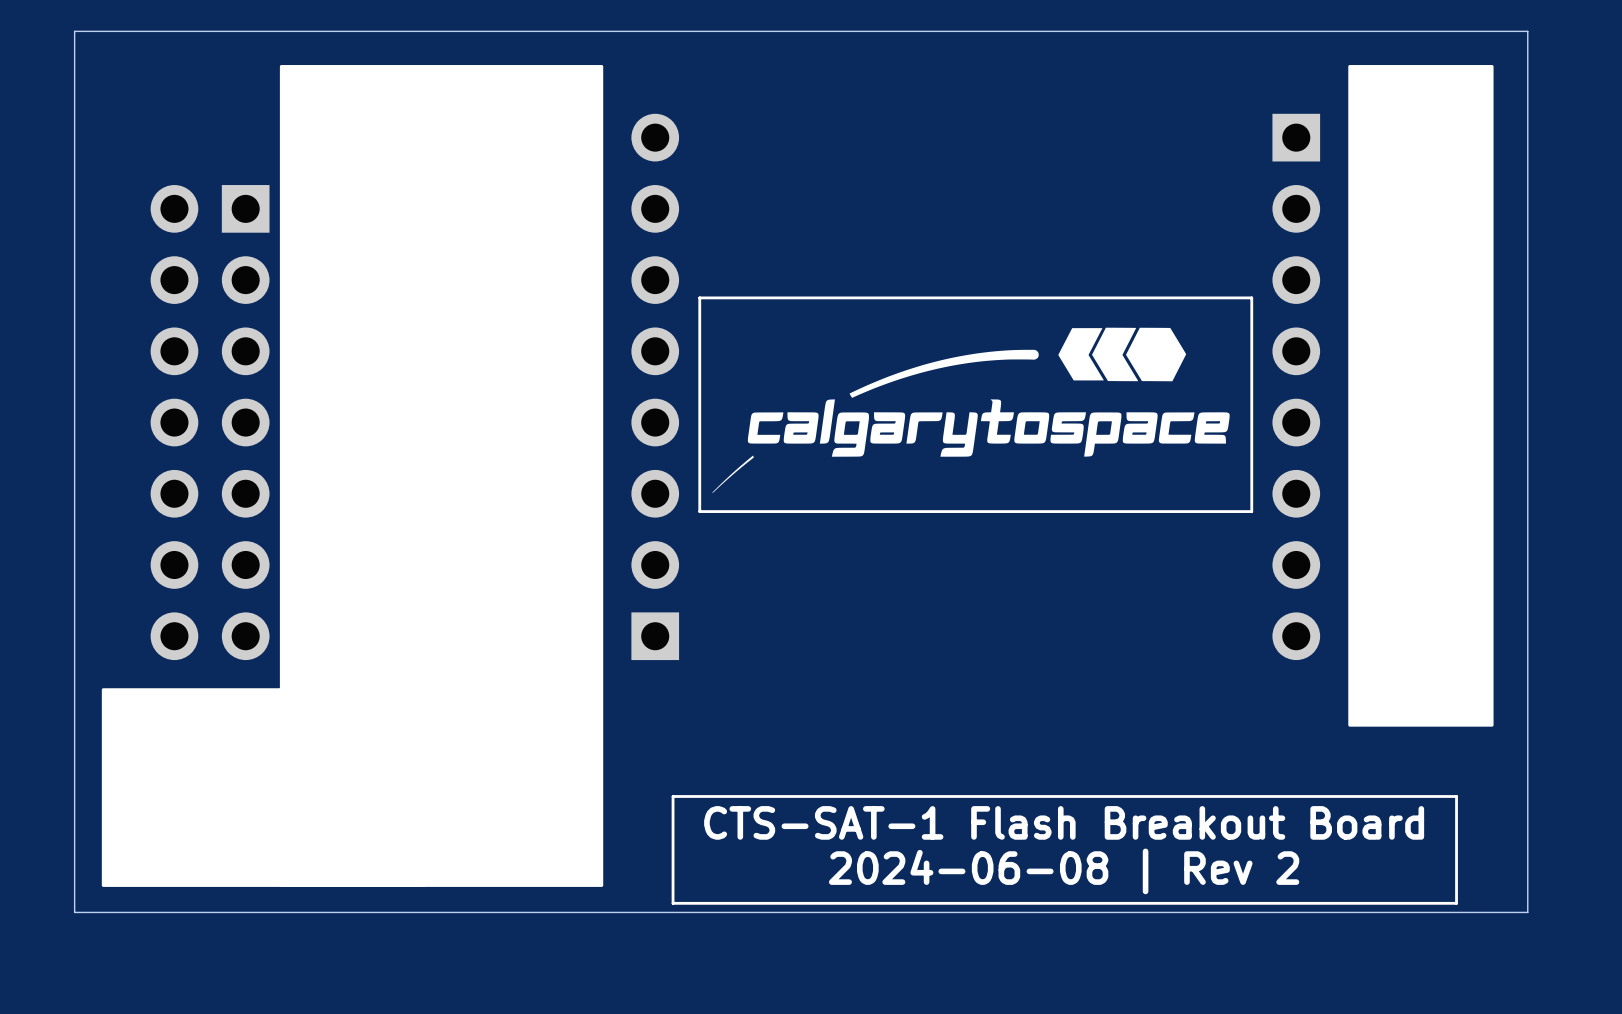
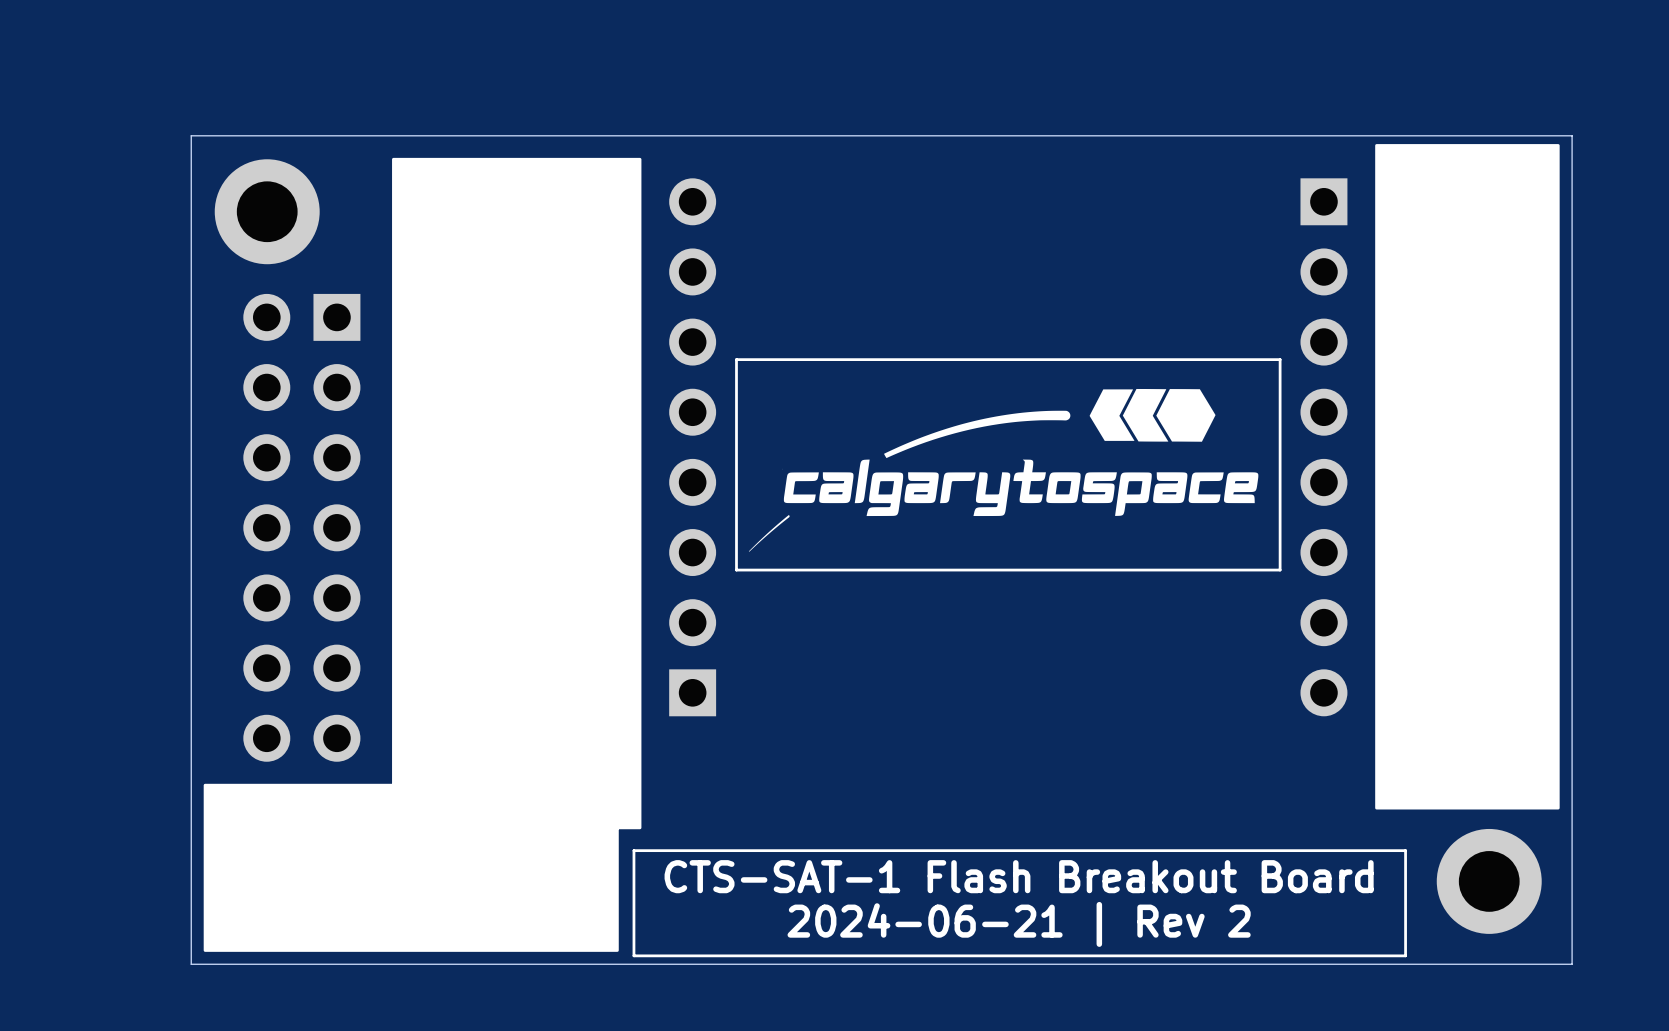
board edge: (1527, 31) (74, 31) (74, 912) (1527, 912) (1527, 31) -> (1572, 135) (1572, 964) (191, 964) (191, 135) (1572, 135)
drawing: [101, 65, 604, 887] -> none
drawing: [1348, 65, 1494, 727] -> none
drawing: none -> [1375, 144, 1560, 810]
drawing: none -> [203, 157, 642, 952]
part: none -> (267, 211)
part position: (210, 422) -> (301, 527)
line: (673, 796) (673, 903) -> (710, 850) (633, 850) (633, 955) (710, 955)
line: (1379, 796) (1456, 796) (1456, 903) (1379, 903) -> (1405, 850) (1405, 955)
text position: CTS-SAT-1 Flash Breakout Board (1064, 822) -> CTS-SAT-1 Flash Breakout Board (1019, 876)
part: none -> (1489, 881)
text: 2024-06-08 | Rev 2 (1064, 871) -> 2024-06-21 | Rev 2 (1019, 924)

